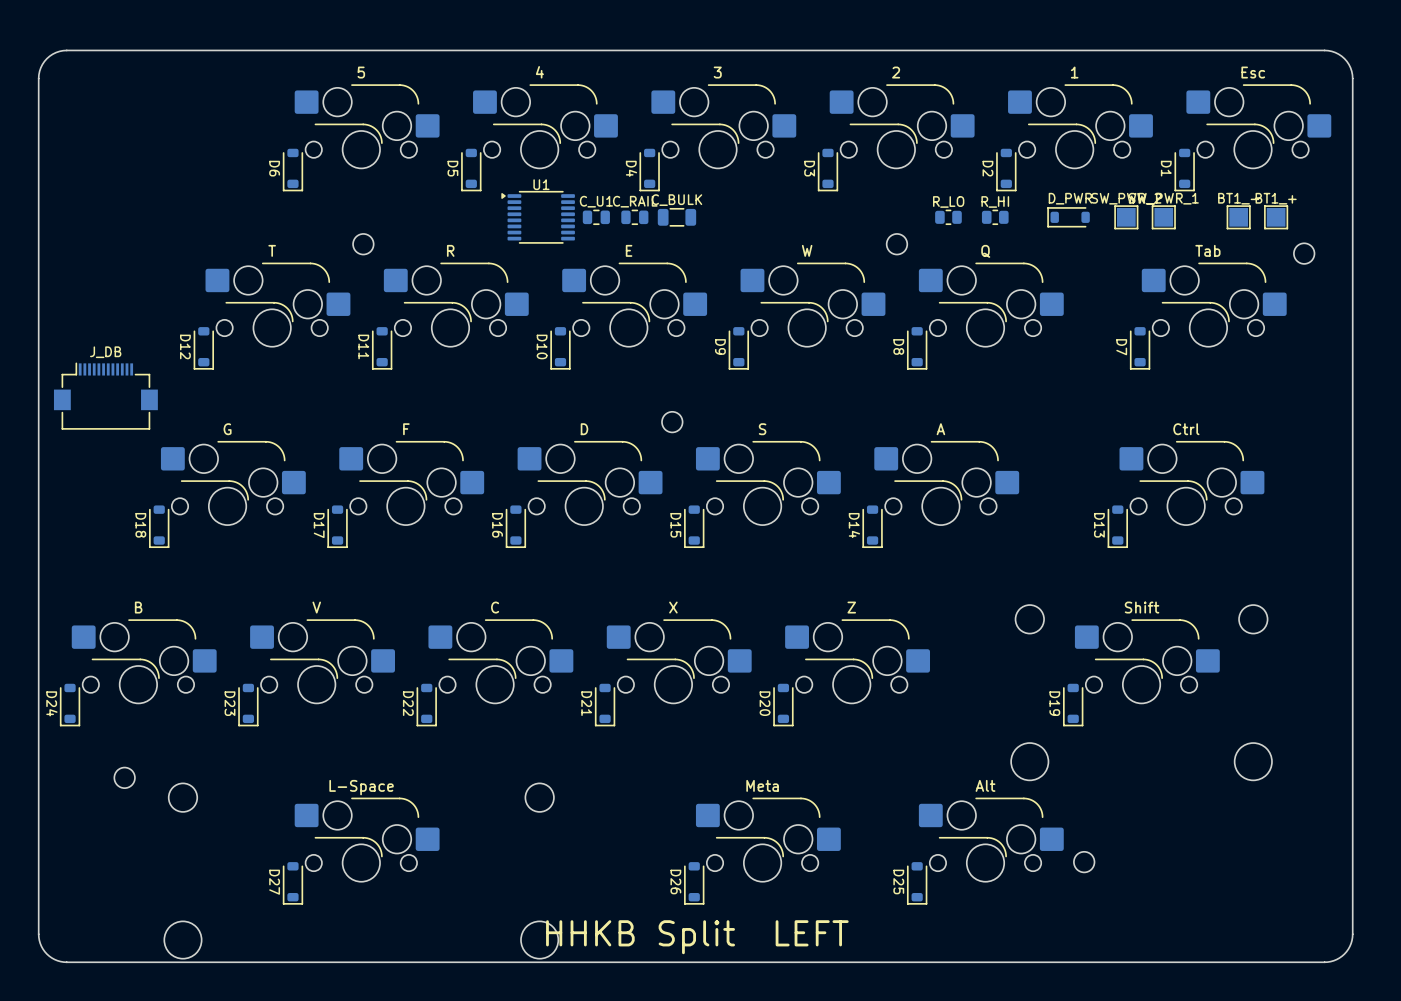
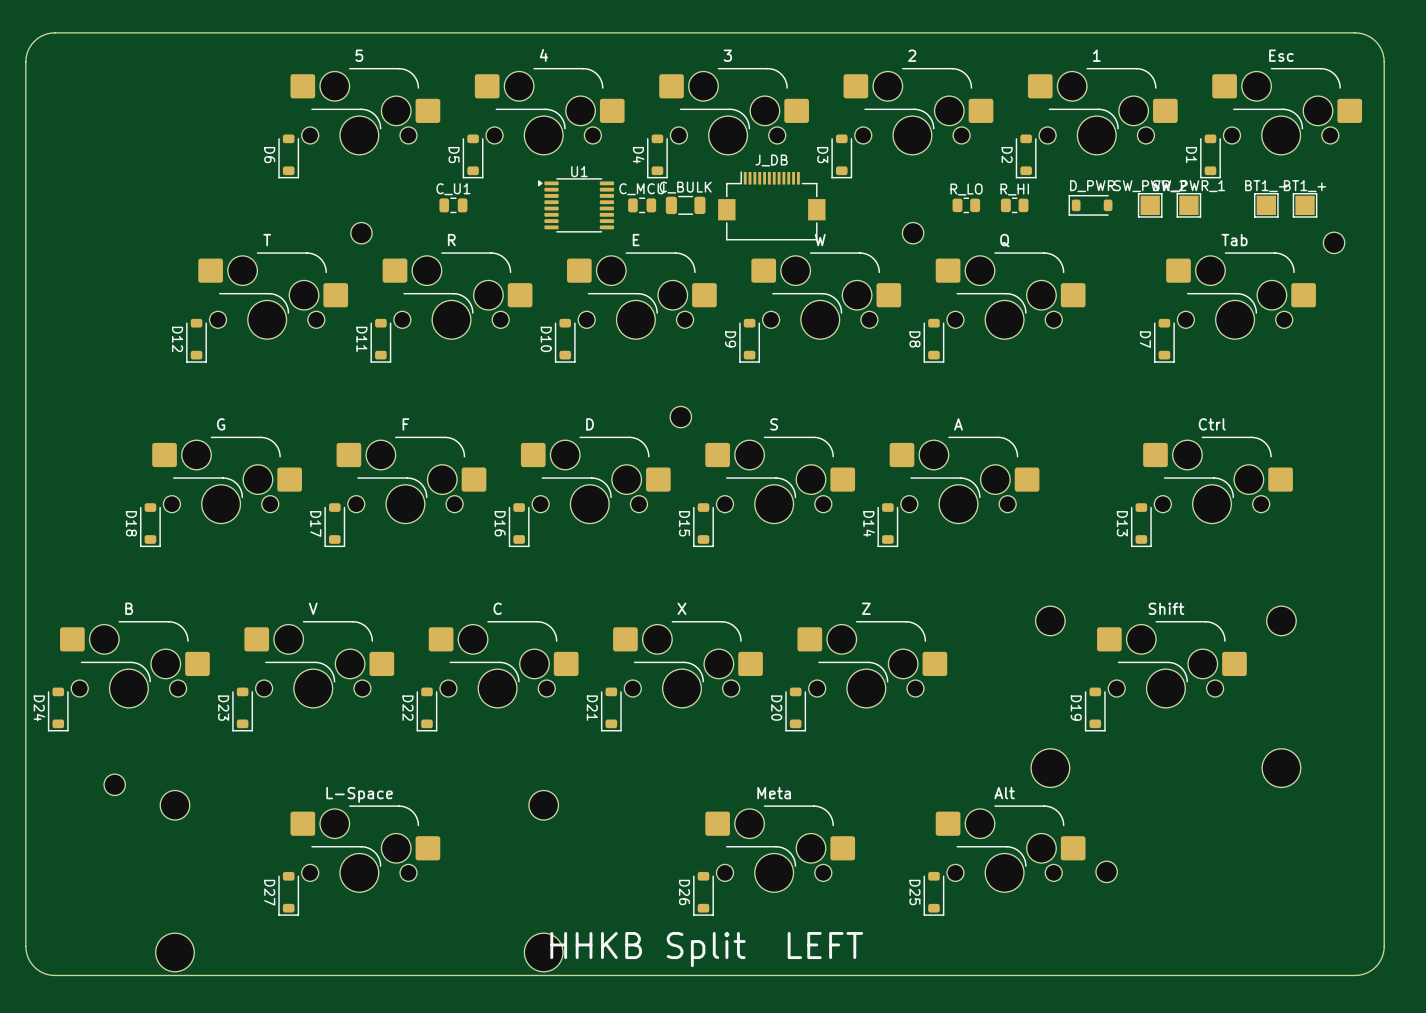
C_RAIL name: C_RAIL (635, 201) -> C_MCU (641, 189)
U1 position: (538, 217) -> (576, 205)
C_U1 position: (596, 217) -> (453, 205)
J_DB: none -> (771, 205)
J_DB: (105, 396) -> none

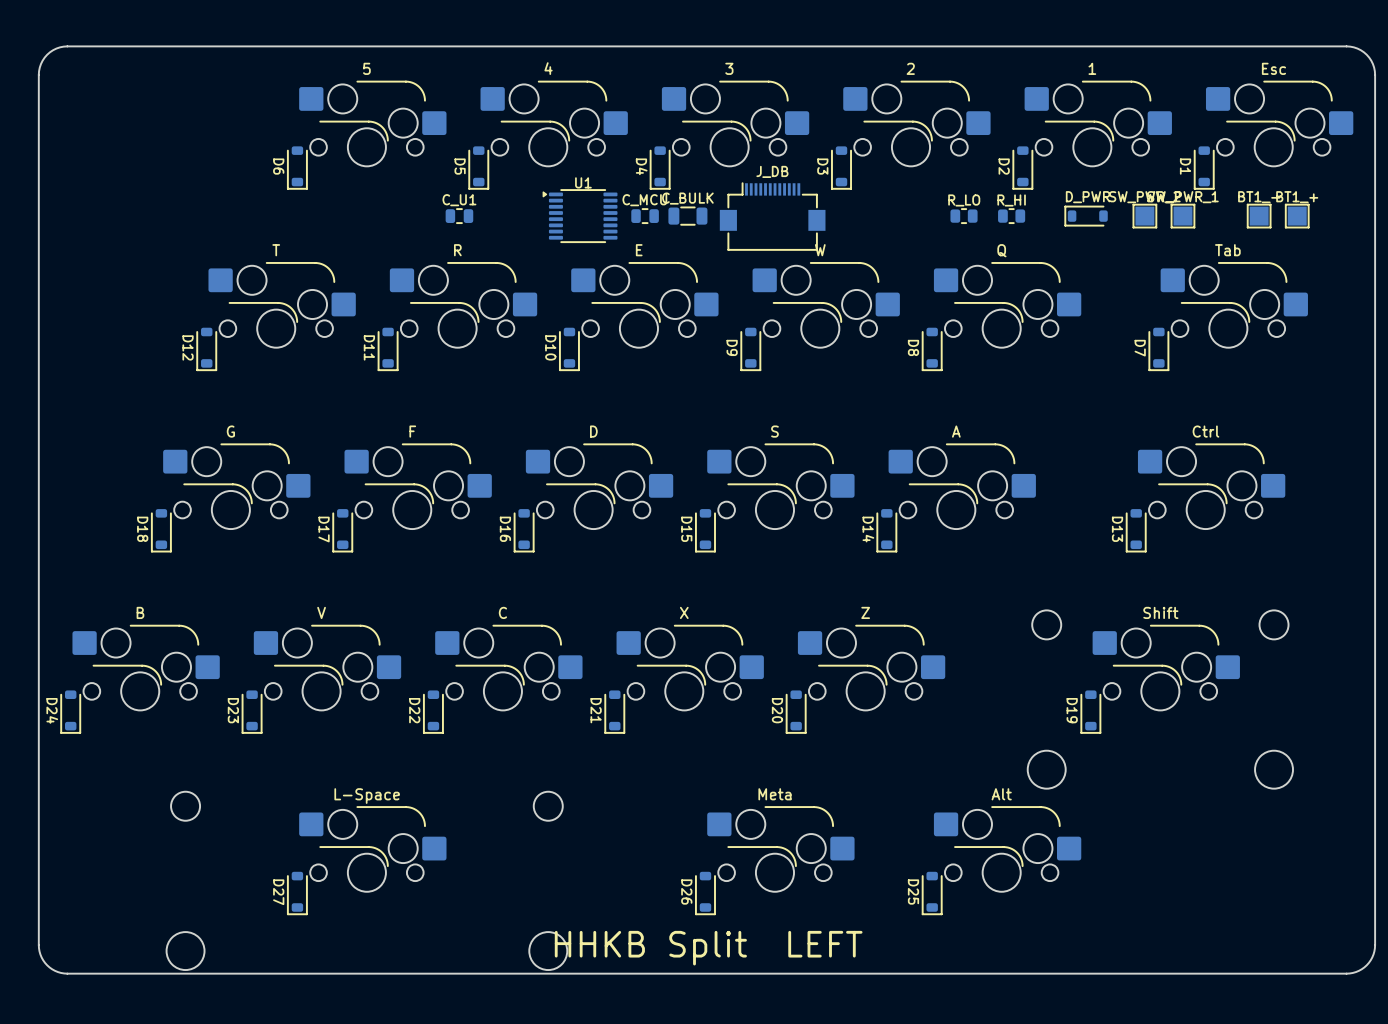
part: (361, 233) -> none
part: (913, 233) -> none
part: (1334, 242) -> none
part: (680, 417) -> none
part: (114, 784) -> none
part: (1106, 871) -> none

